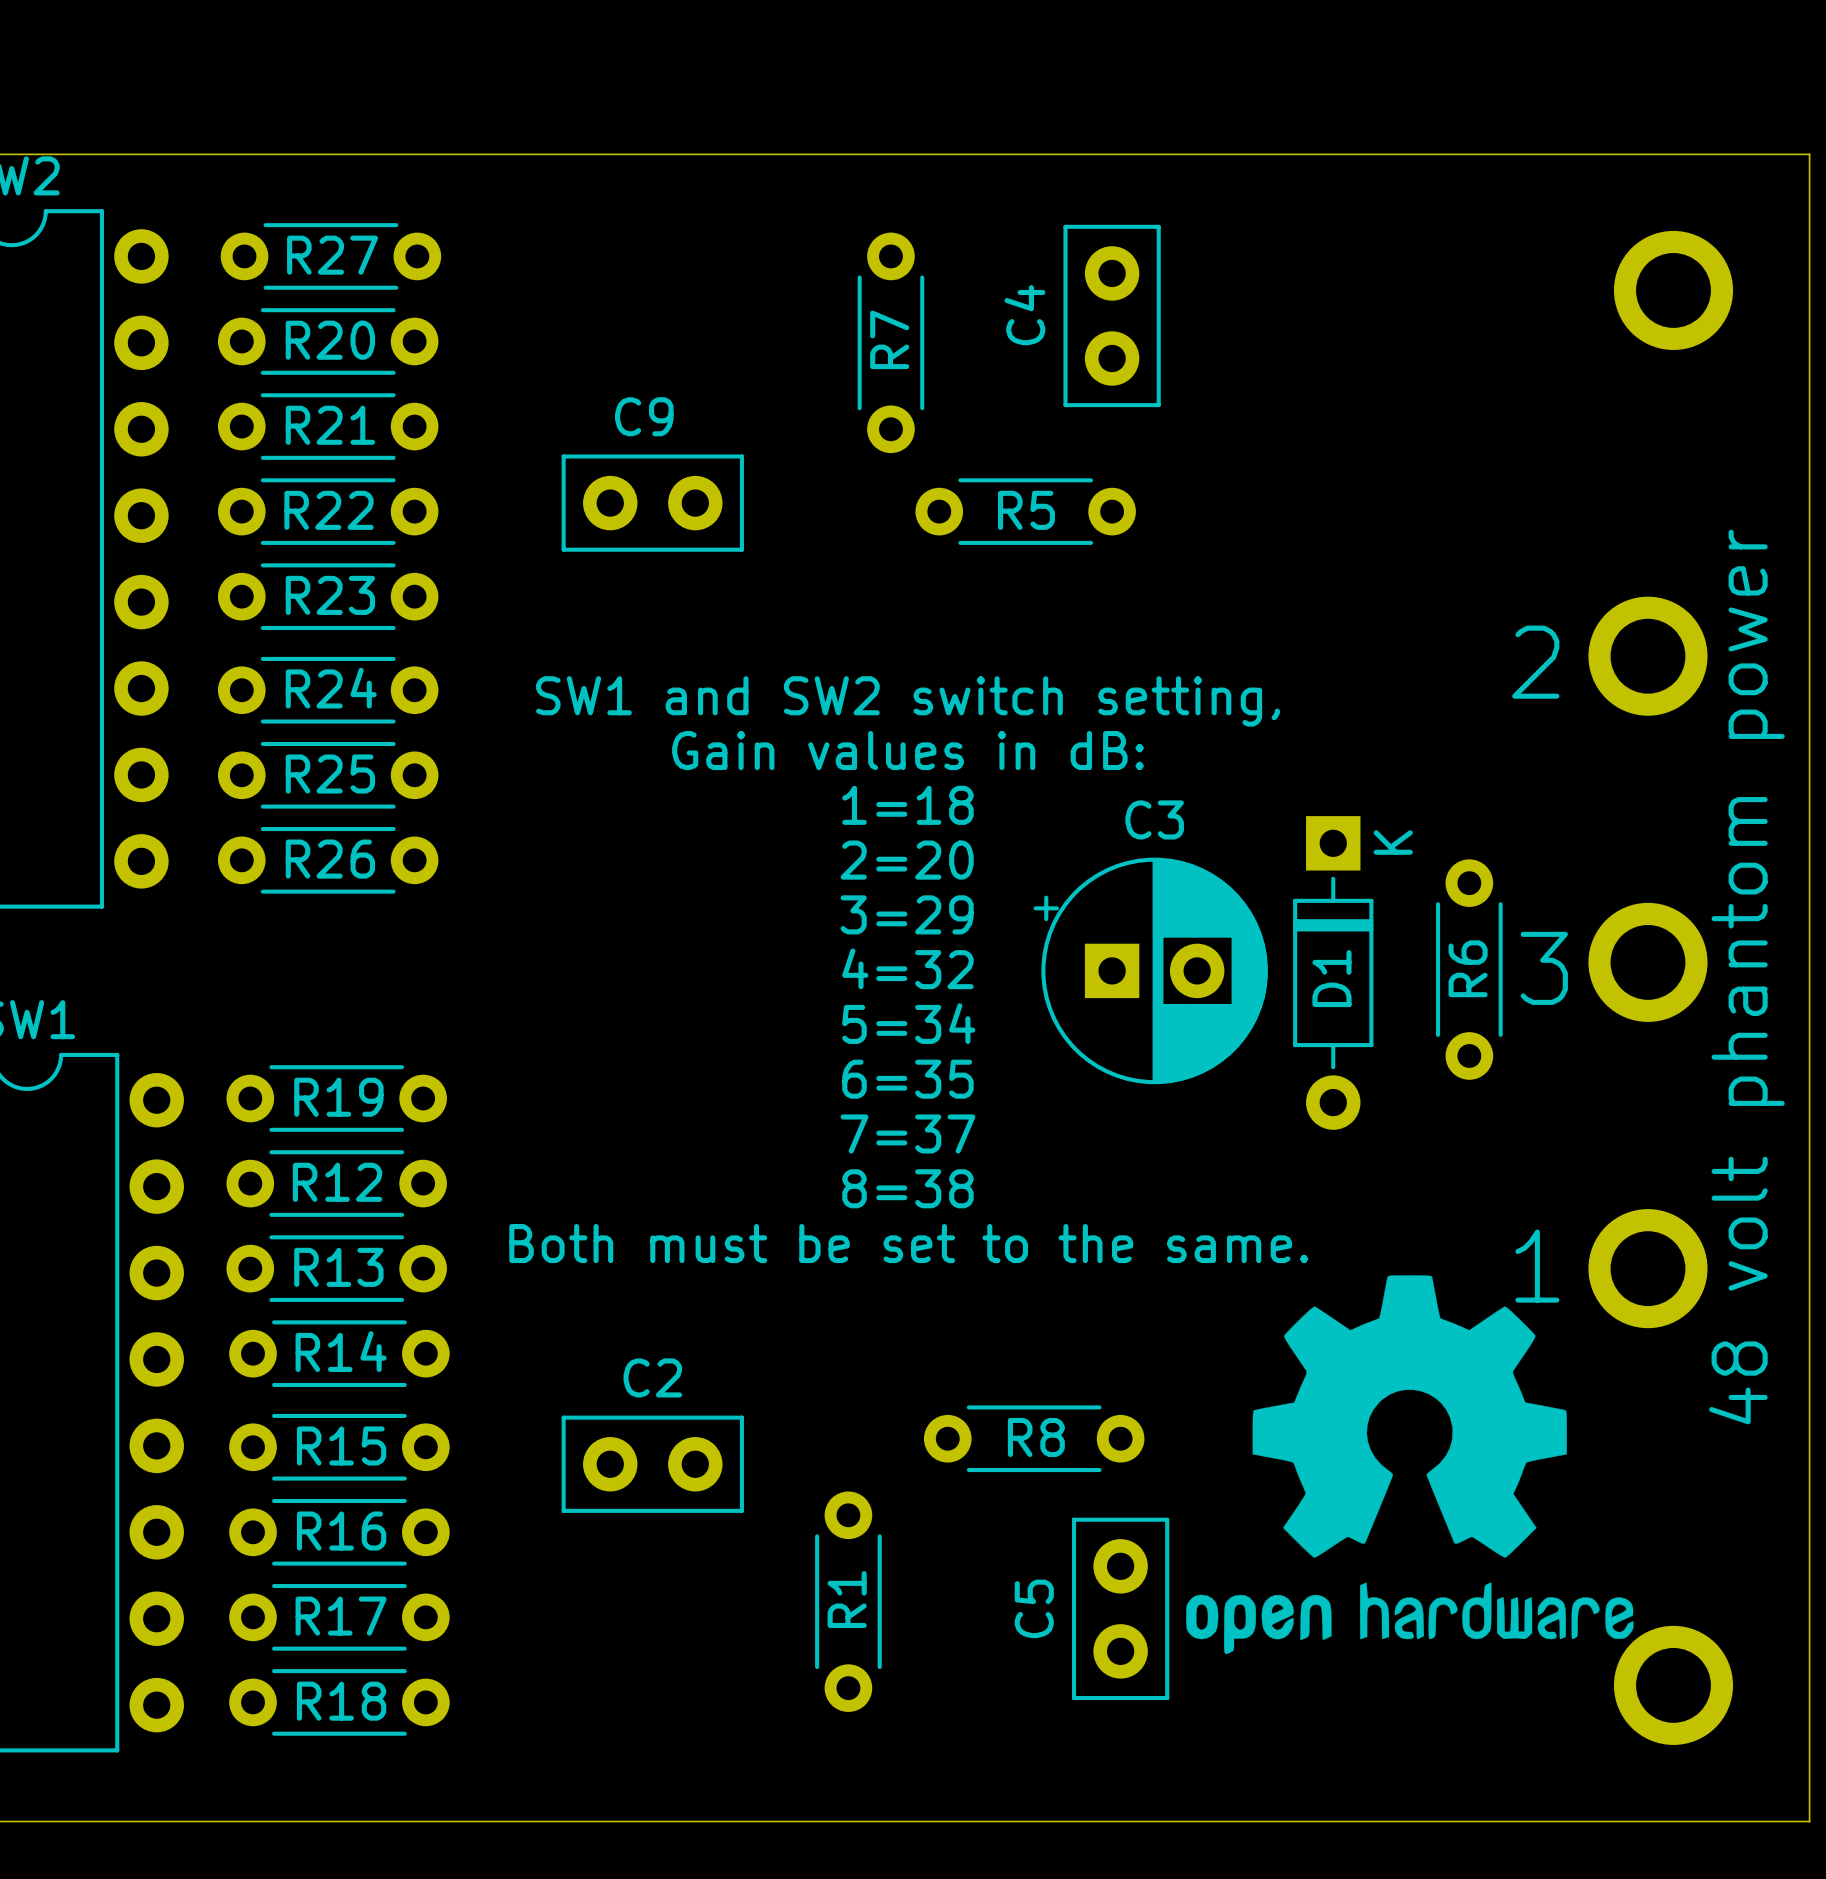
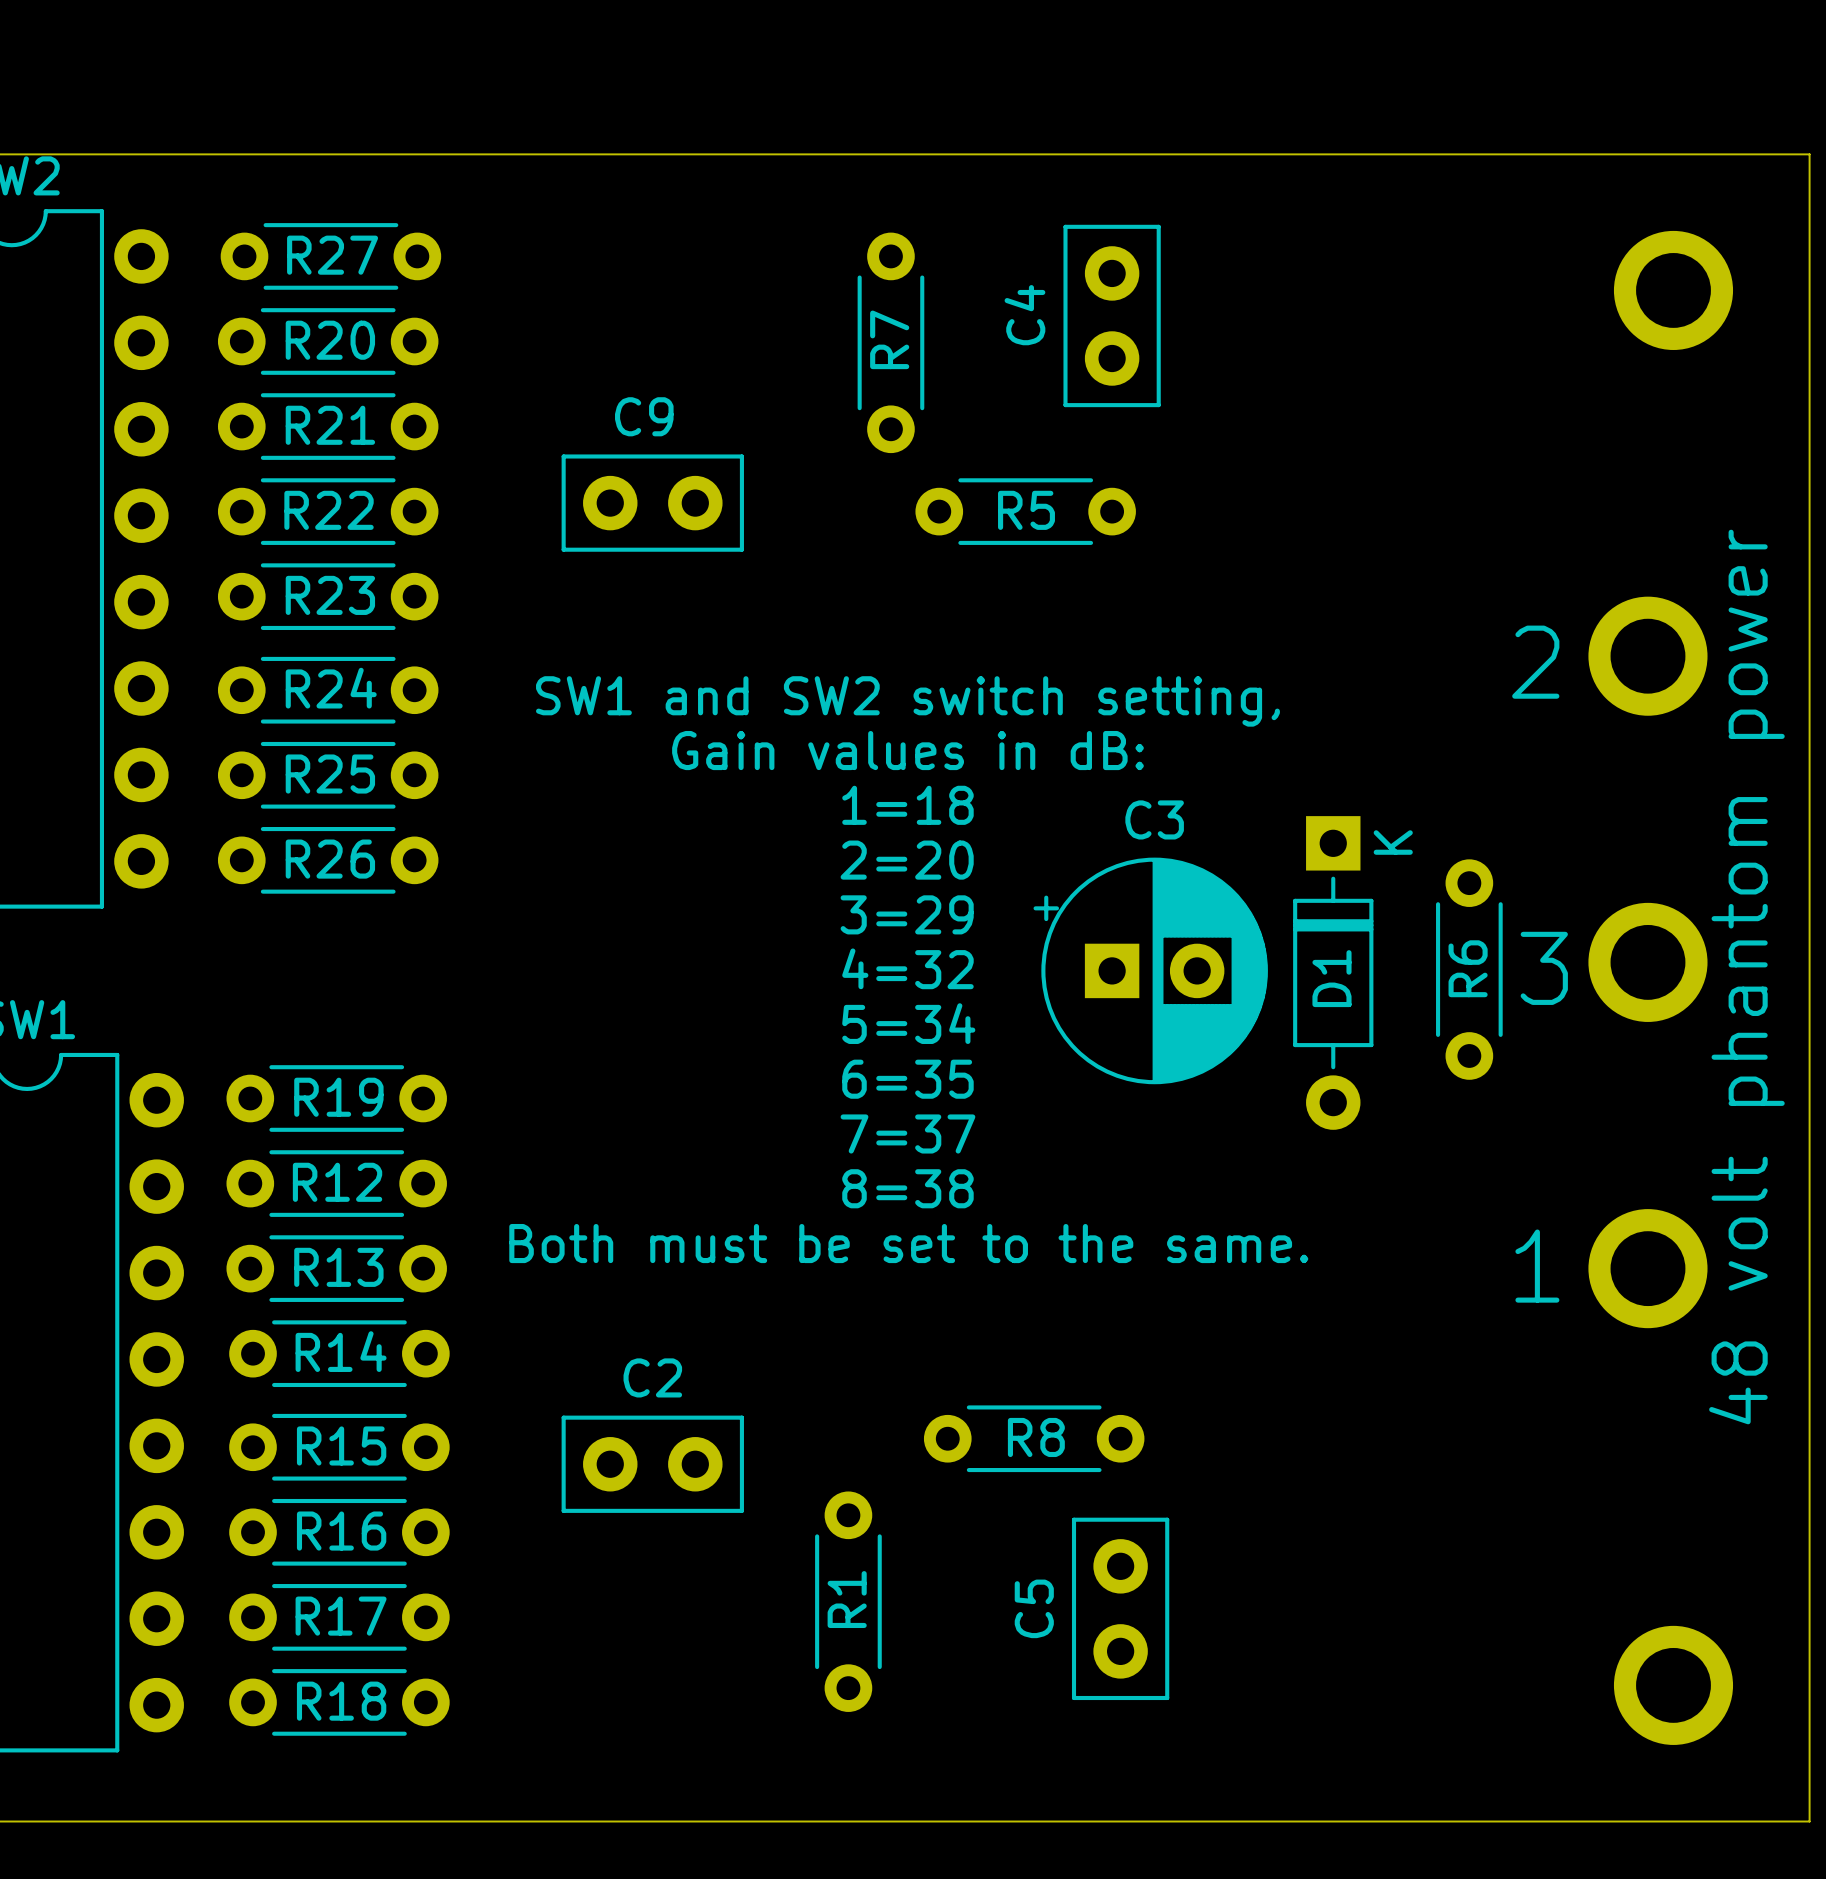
drawing: [1186, 1275, 1634, 1655] -> none

